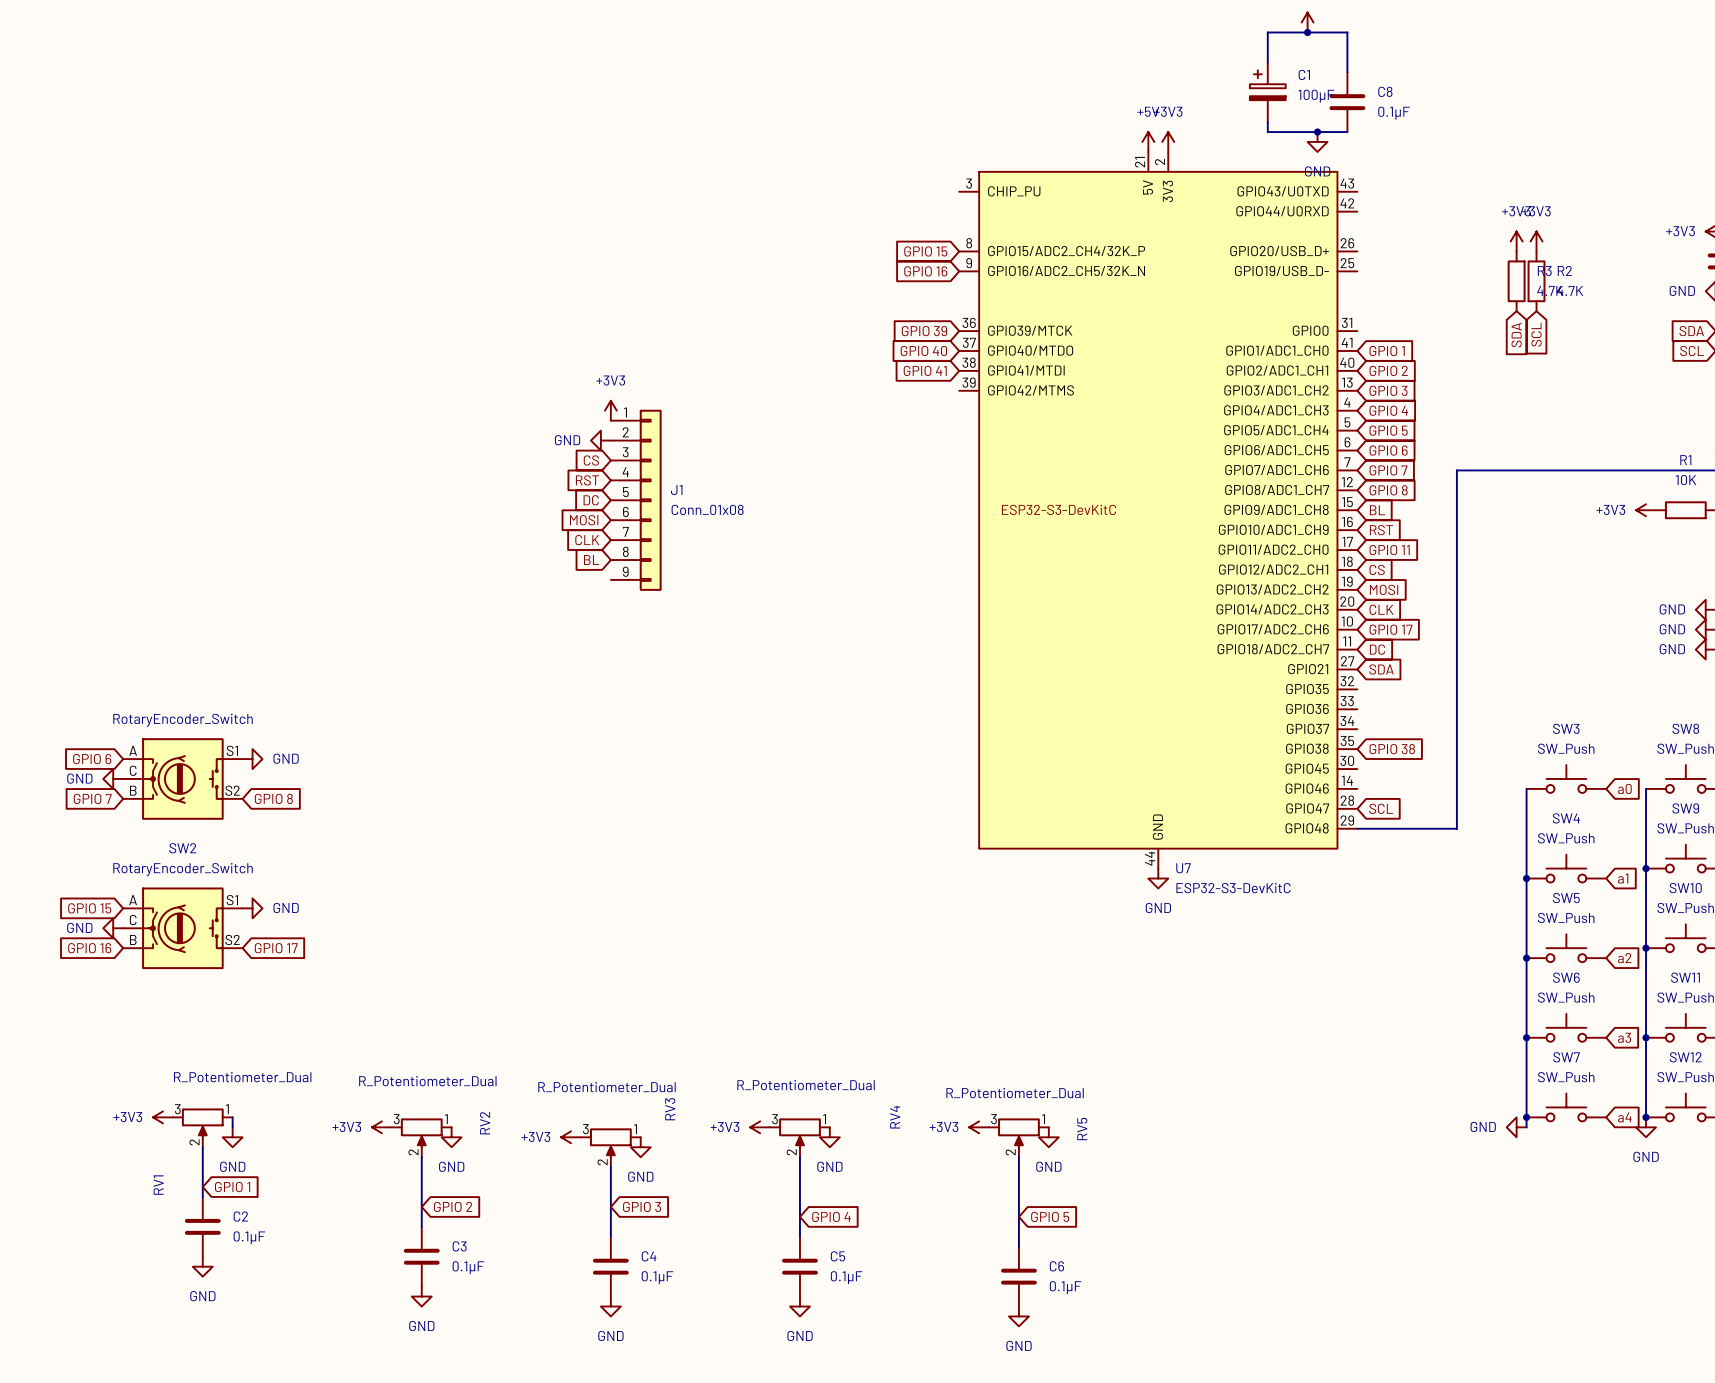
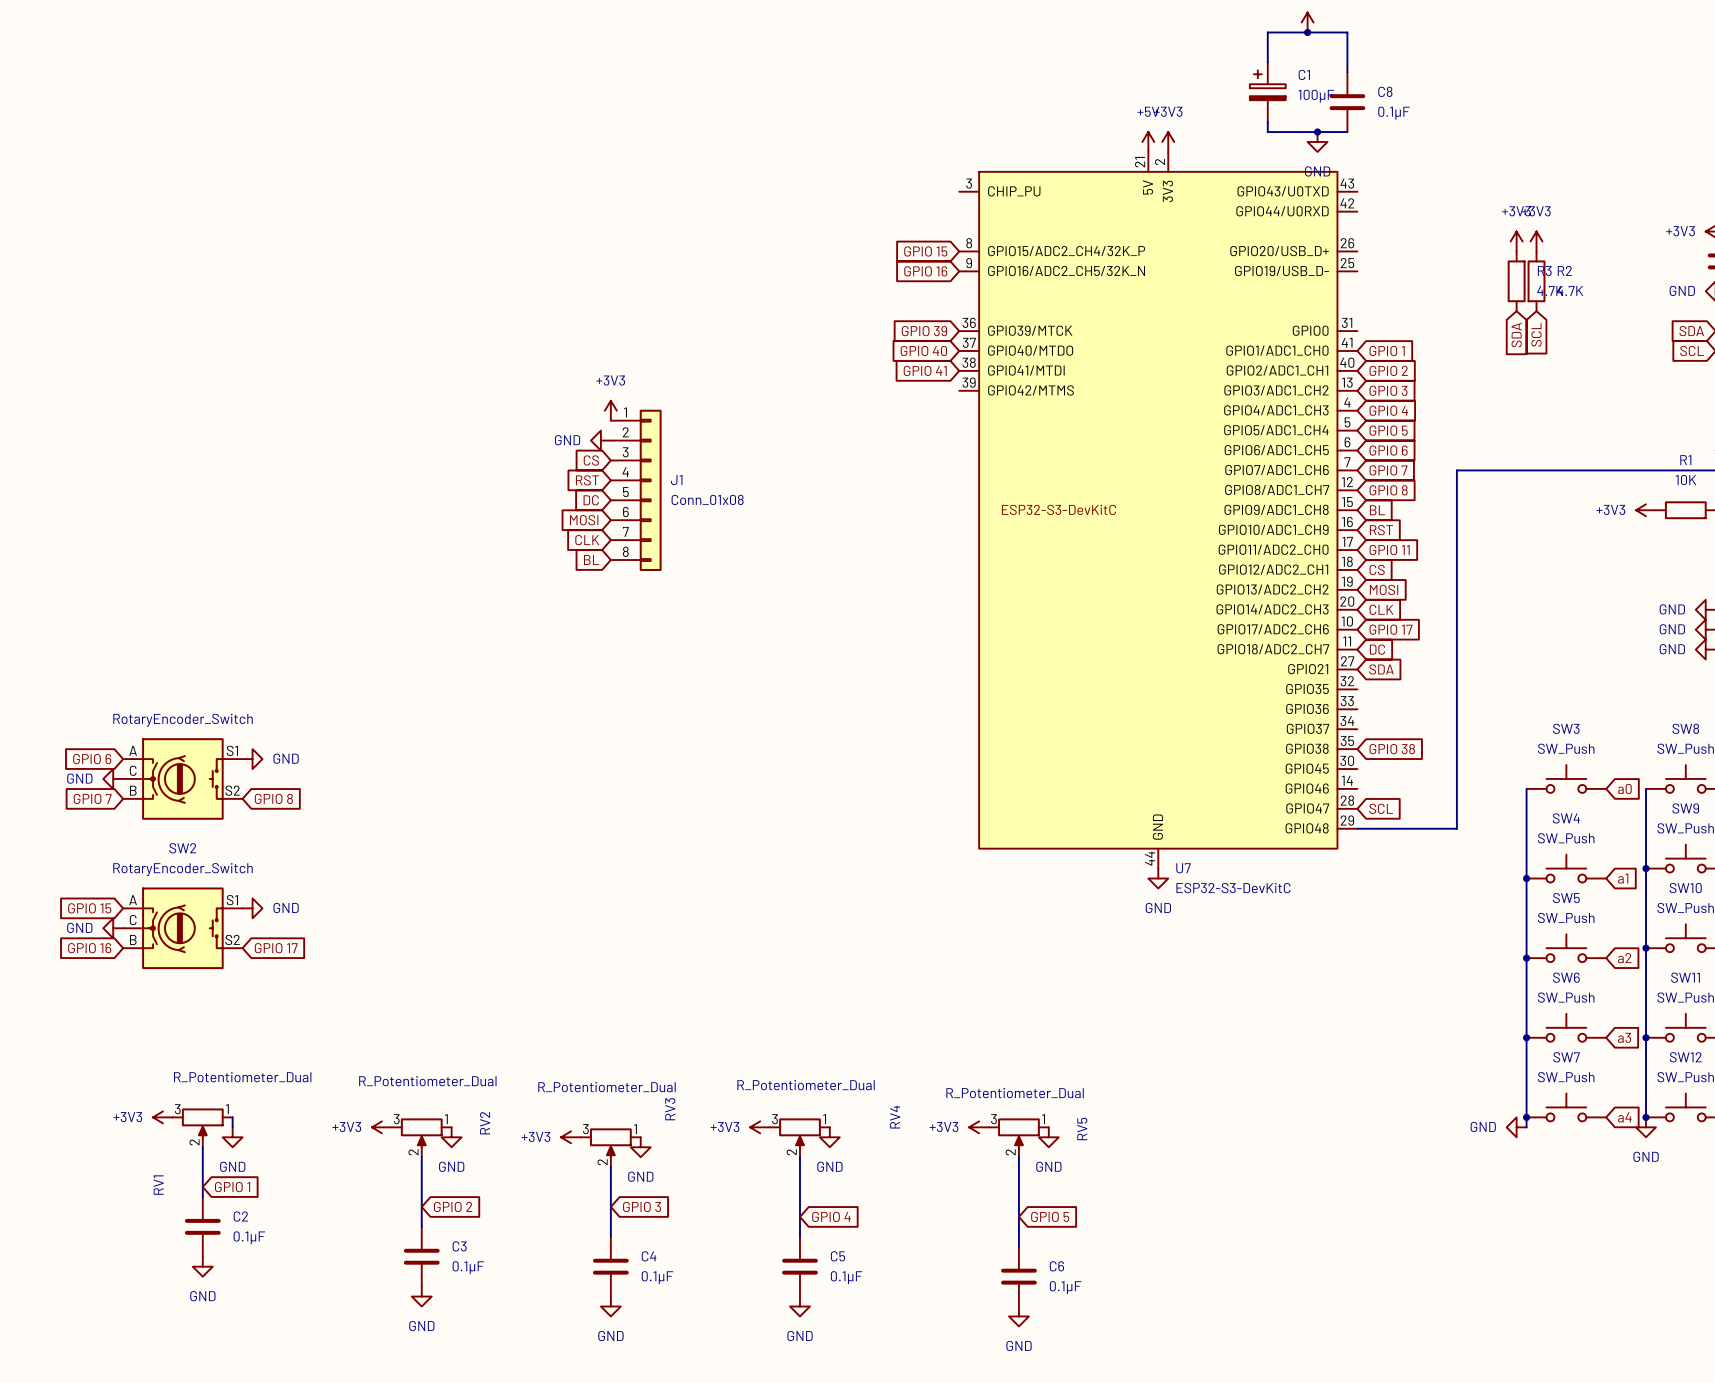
J1 symbol: [610, 409, 662, 591] -> [610, 409, 662, 571]

